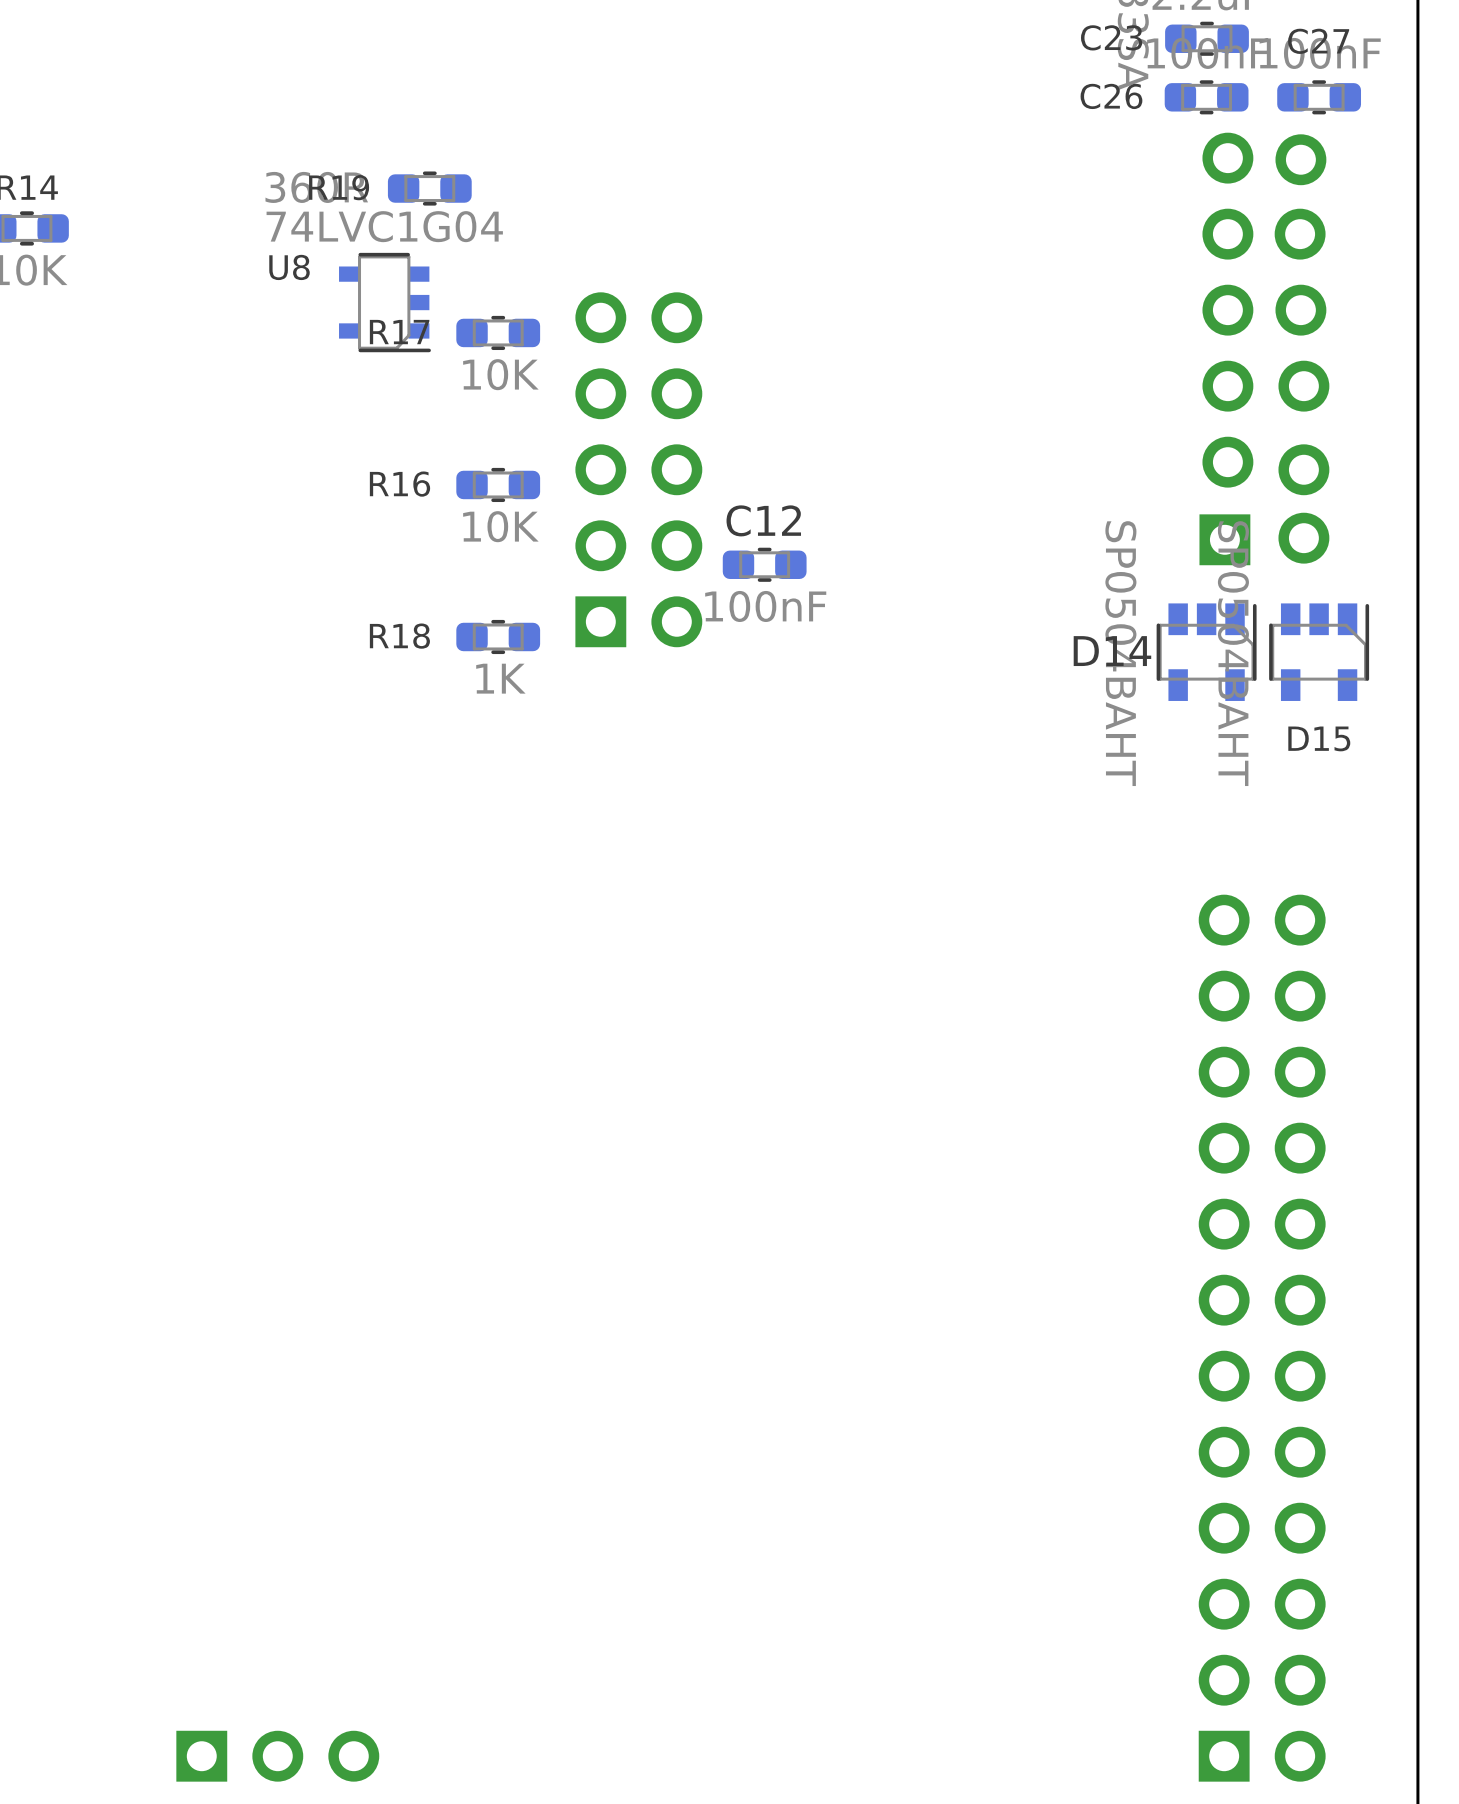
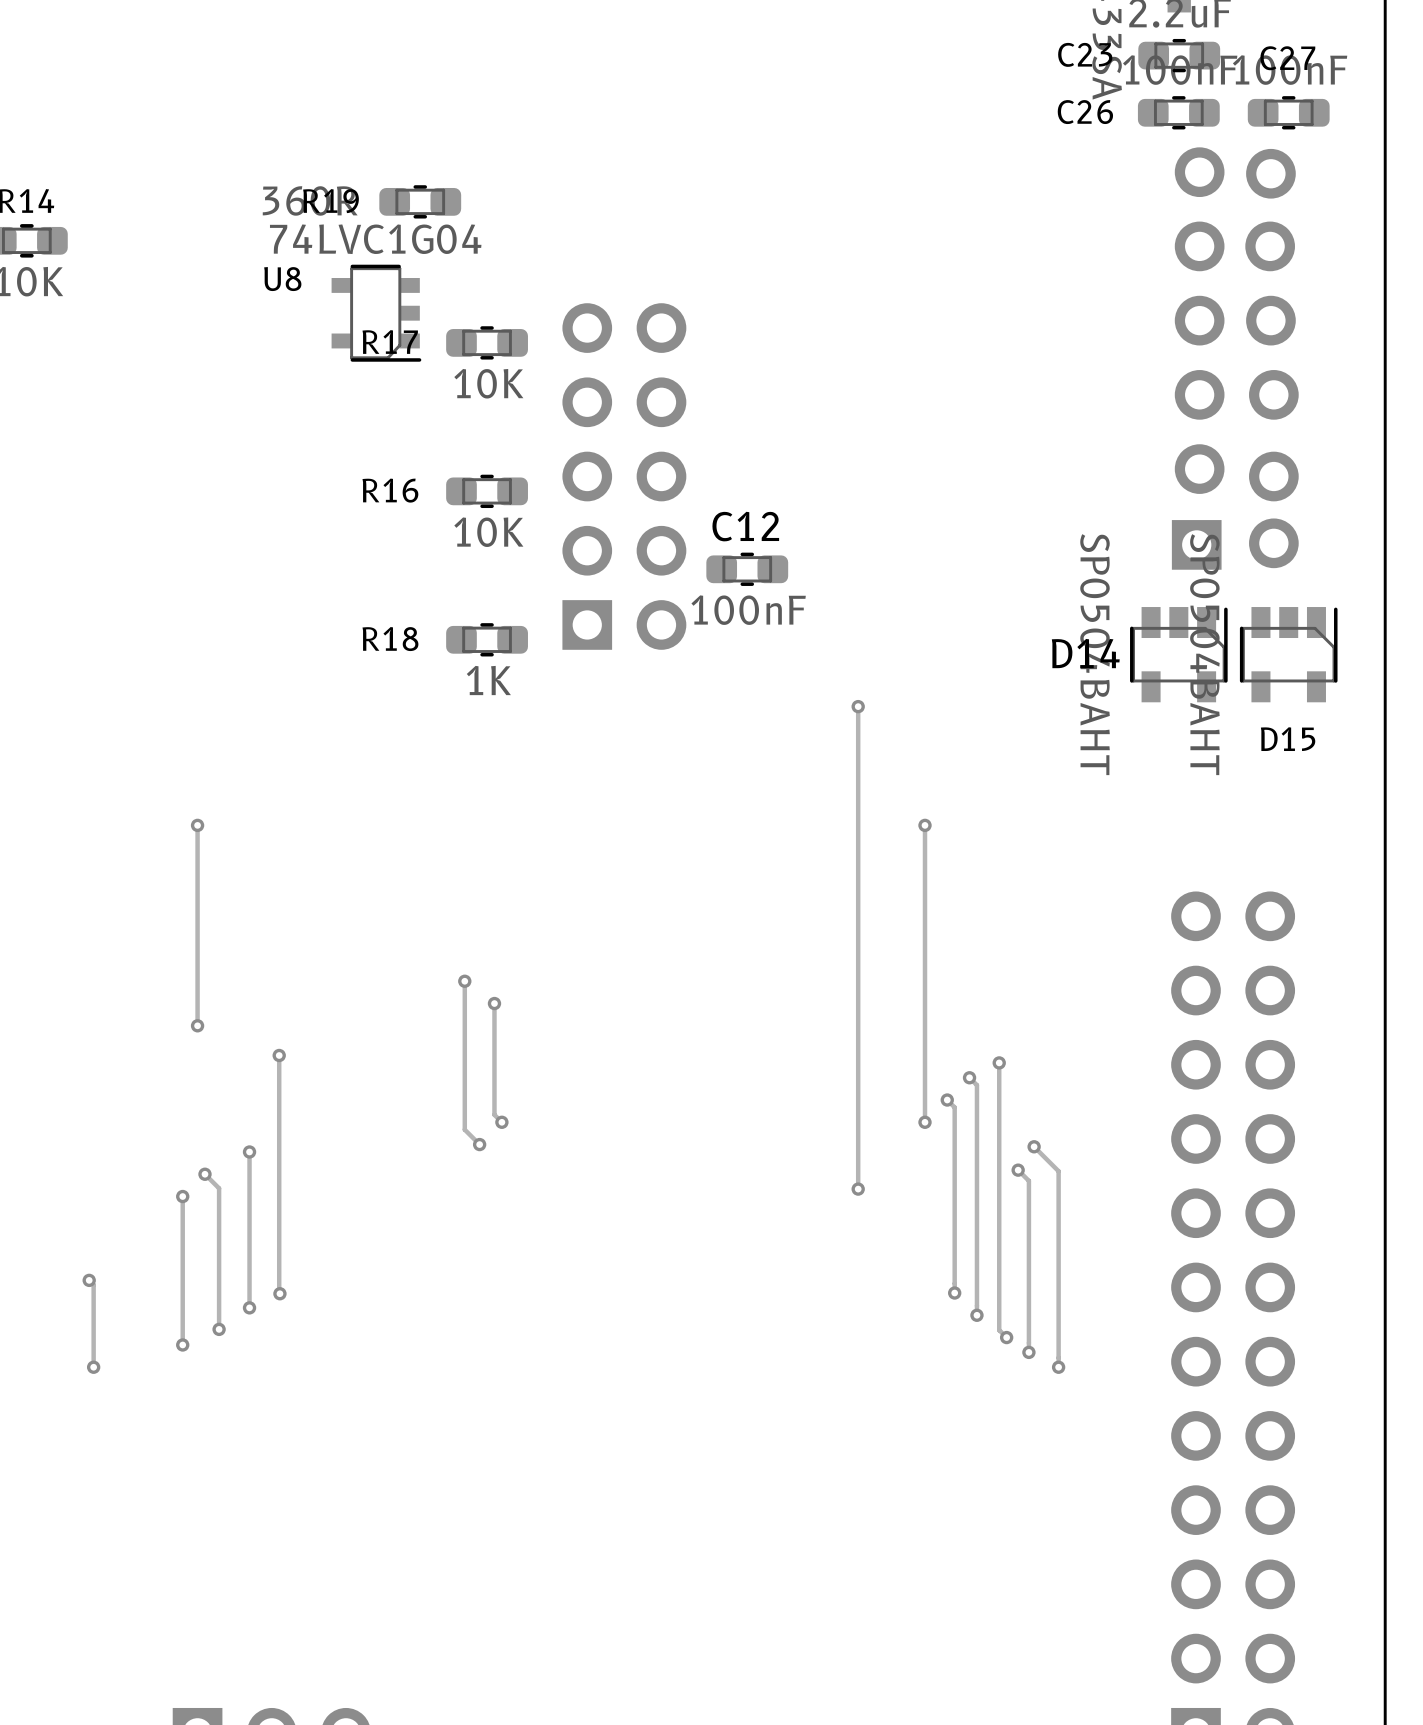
track: none -> (858, 706) (858, 1189)
via: none -> (858, 706)
track: none -> (197, 825) (197, 1025)
via: none -> (197, 825)
track: none -> (925, 825) (925, 1122)
via: none -> (925, 825)
track: none -> (464, 981) (464, 1129) (479, 1144)
via: none -> (464, 981)
track: none -> (494, 1003) (494, 1114) (501, 1122)
via: none -> (494, 1003)
via: none -> (197, 1025)
track: none -> (279, 1055) (279, 1293)
via: none -> (279, 1055)
track: none -> (999, 1062) (999, 1330) (1006, 1337)
via: none -> (999, 1062)
track: none -> (969, 1077) (976, 1085) (976, 1315)
via: none -> (969, 1077)
track: none -> (947, 1100) (954, 1107) (954, 1293)
via: none -> (947, 1100)
via: none -> (501, 1122)
via: none -> (925, 1122)
via: none -> (479, 1144)
track: none -> (1034, 1146) (1058, 1171) (1058, 1367)
via: none -> (1034, 1146)
track: none -> (249, 1151) (249, 1307)
via: none -> (249, 1151)
track: none -> (1018, 1170) (1028, 1180) (1028, 1352)
via: none -> (1018, 1170)
track: none -> (204, 1174) (219, 1188) (219, 1329)
via: none -> (204, 1174)
via: none -> (858, 1189)
track: none -> (182, 1196) (182, 1344)
via: none -> (182, 1196)
track: none -> (89, 1280) (93, 1284) (93, 1367)
via: none -> (89, 1280)
via: none -> (954, 1293)
via: none -> (279, 1293)
via: none -> (249, 1307)
via: none -> (976, 1315)
via: none -> (219, 1329)
via: none -> (1006, 1337)
via: none -> (182, 1344)
via: none -> (1028, 1352)
via: none -> (93, 1367)
via: none -> (1058, 1367)

